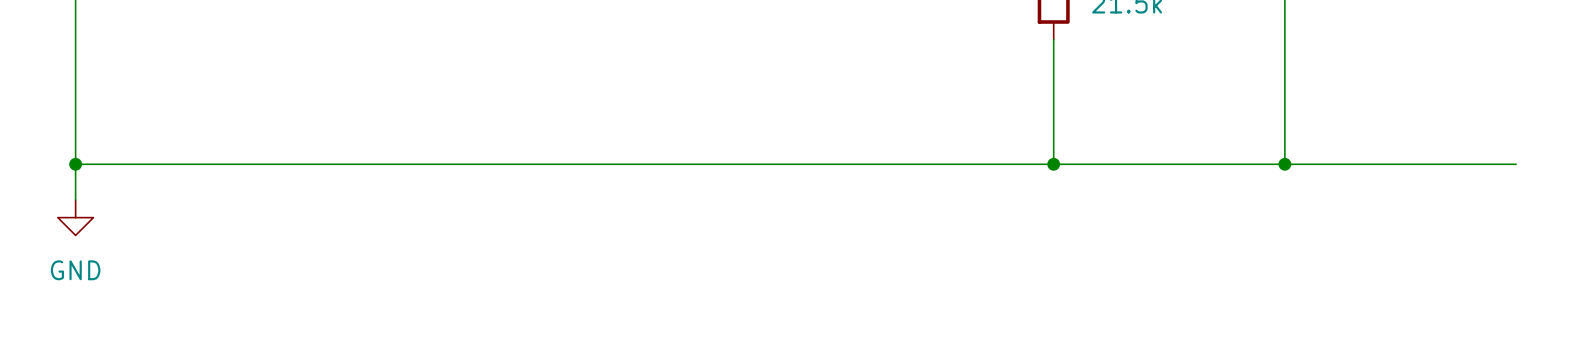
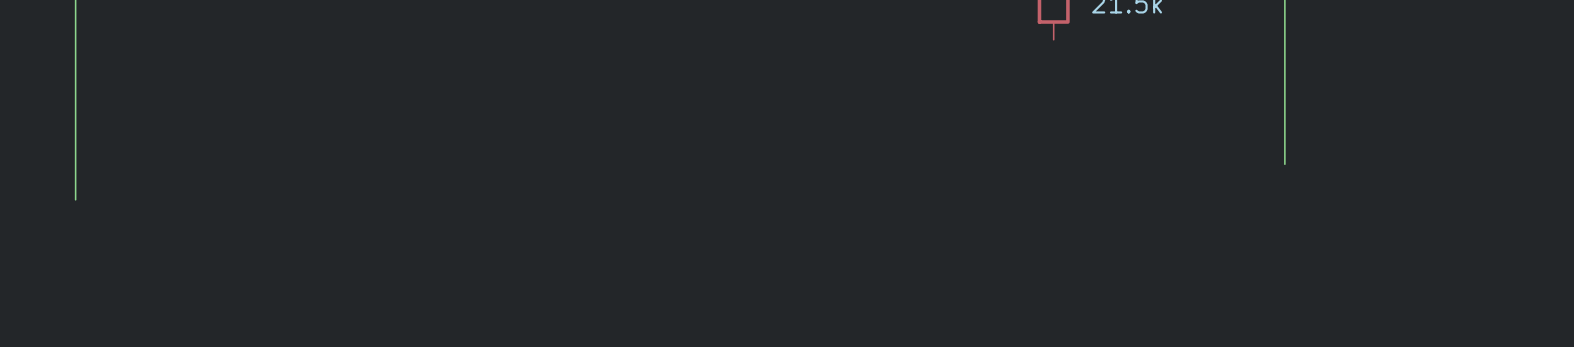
wire: (1053, 39) (1053, 164) -> none
wire: (75, 164) (1516, 164) -> none
junction: (75, 164) -> none
junction: (1053, 164) -> none
junction: (1284, 164) -> none
power symbol: GND (75, 217) -> none

